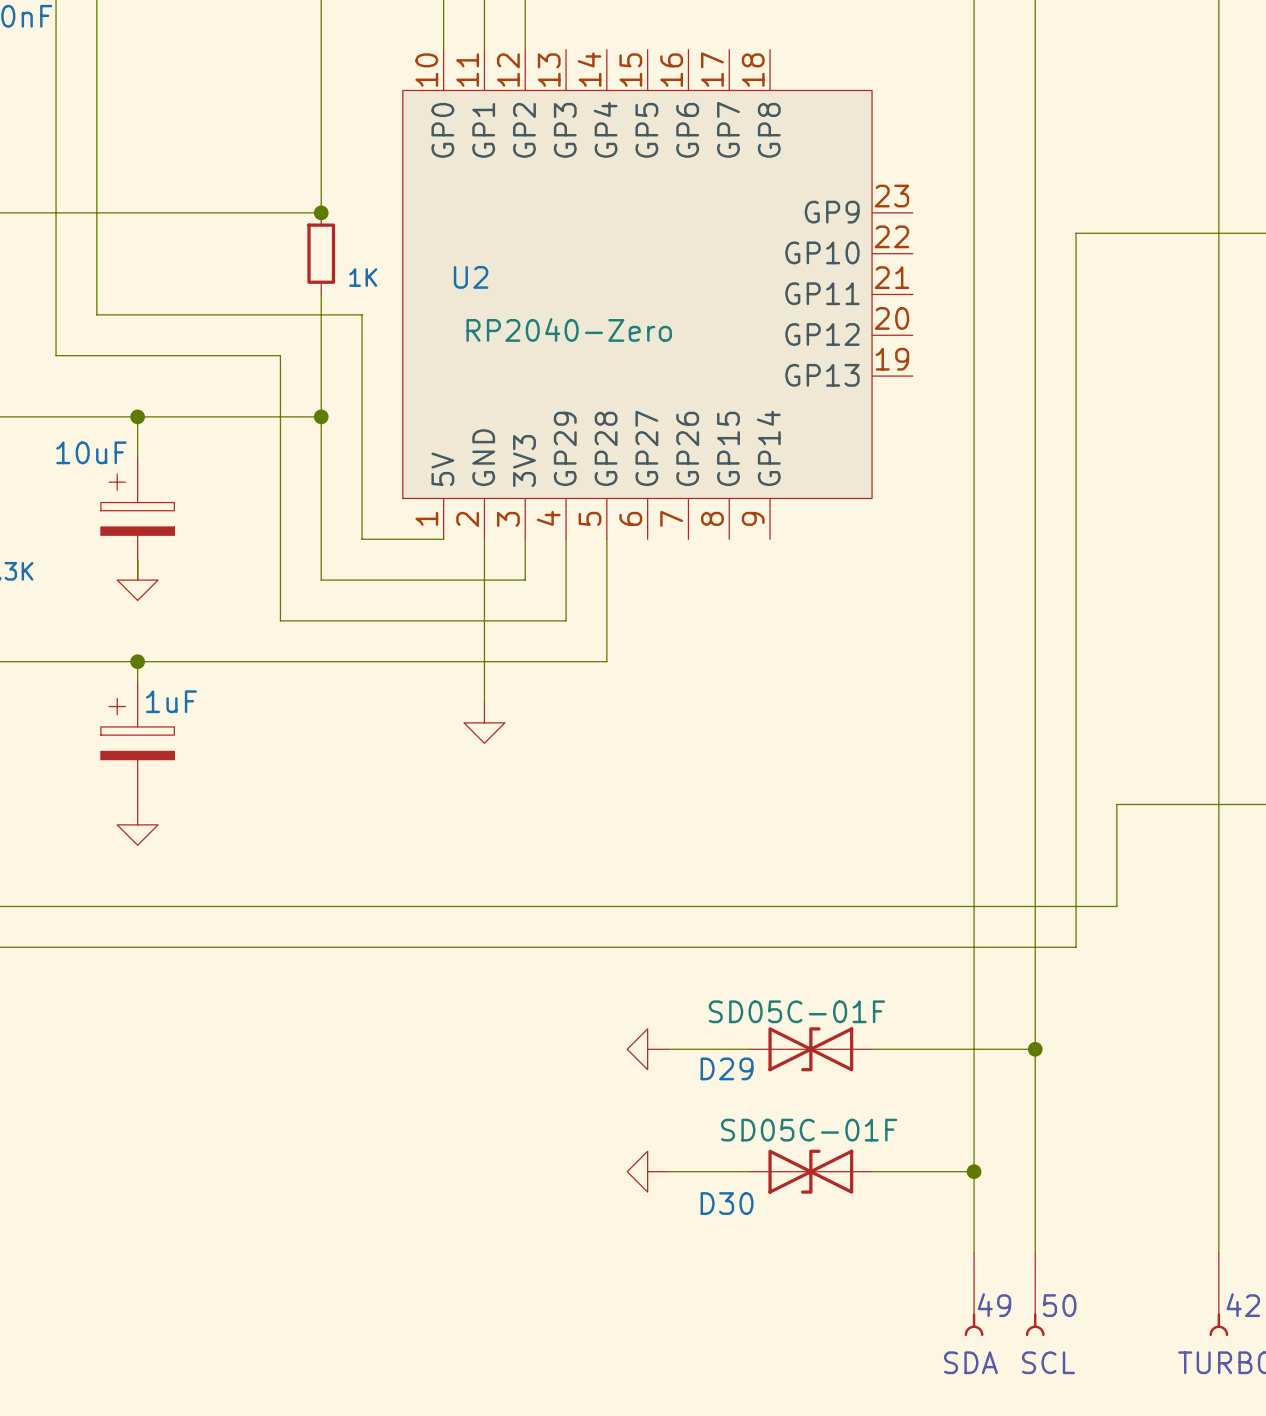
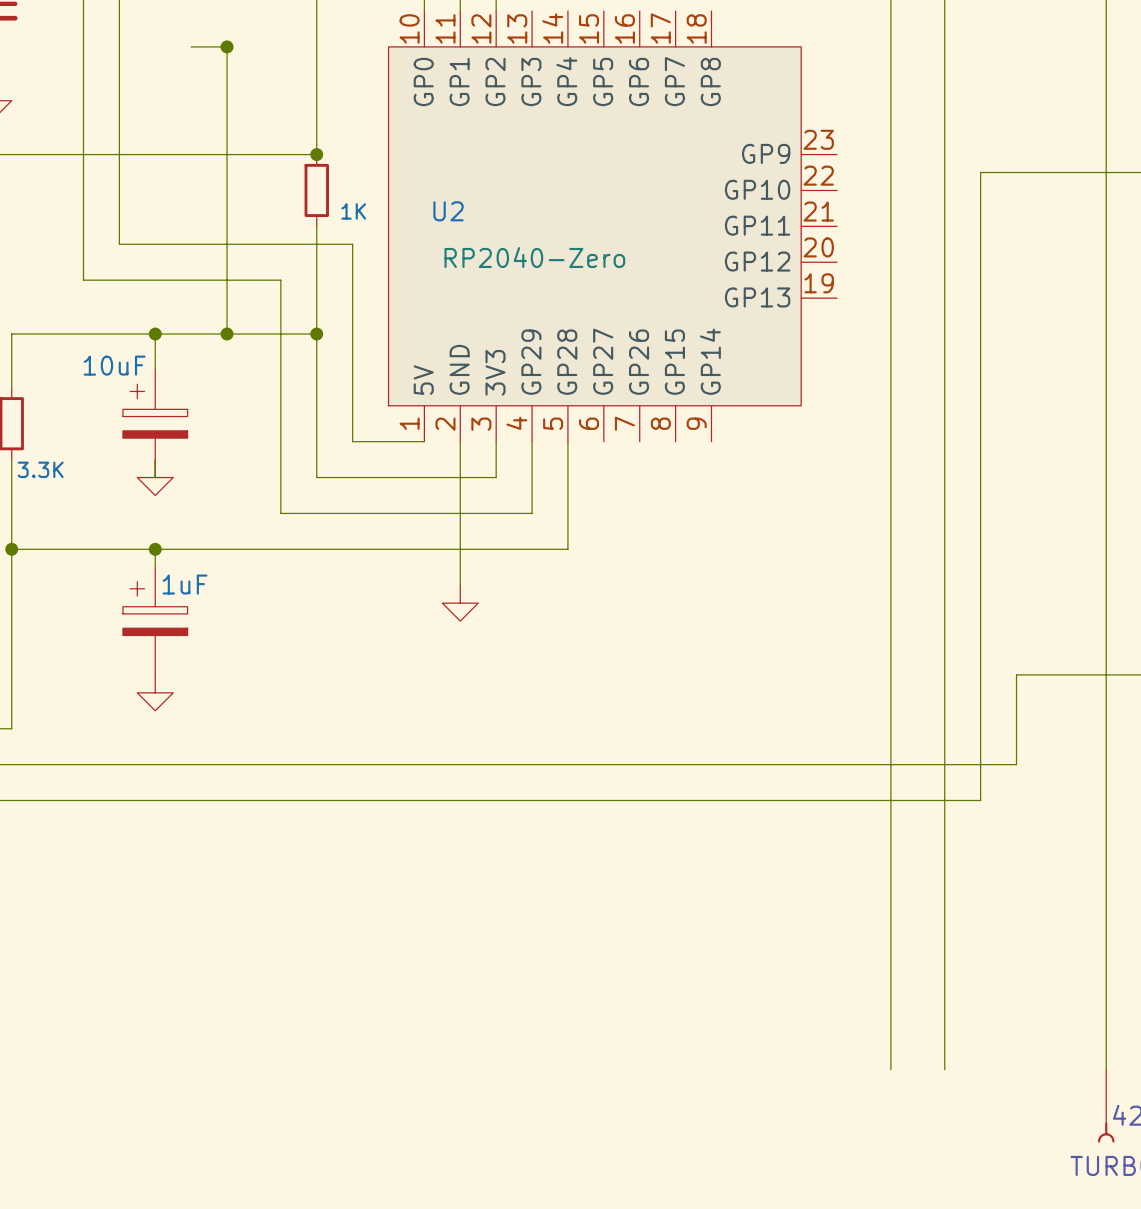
wire: none -> (191, 46) (227, 46) (227, 334)
junction: none -> (227, 46)
junction: none -> (227, 334)
power symbol: (647, 1049) -> none
wire: (668, 1049) (749, 1049) -> none
D29: SD05C-01F (810, 1049) -> none
wire: (872, 1049) (1035, 1049) -> none
junction: (1035, 1049) -> none
power symbol: (647, 1171) -> none
wire: (668, 1171) (749, 1171) -> none
D30: SD05C-01F (810, 1171) -> none
wire: (872, 1171) (974, 1171) -> none
junction: (974, 1171) -> none
part: (974, 1294) -> none
part: (1035, 1294) -> none
text: 49 (994, 1305) -> none
text: 50 (1059, 1305) -> none
text: SDA (970, 1362) -> none
text: SCL (1048, 1362) -> none

